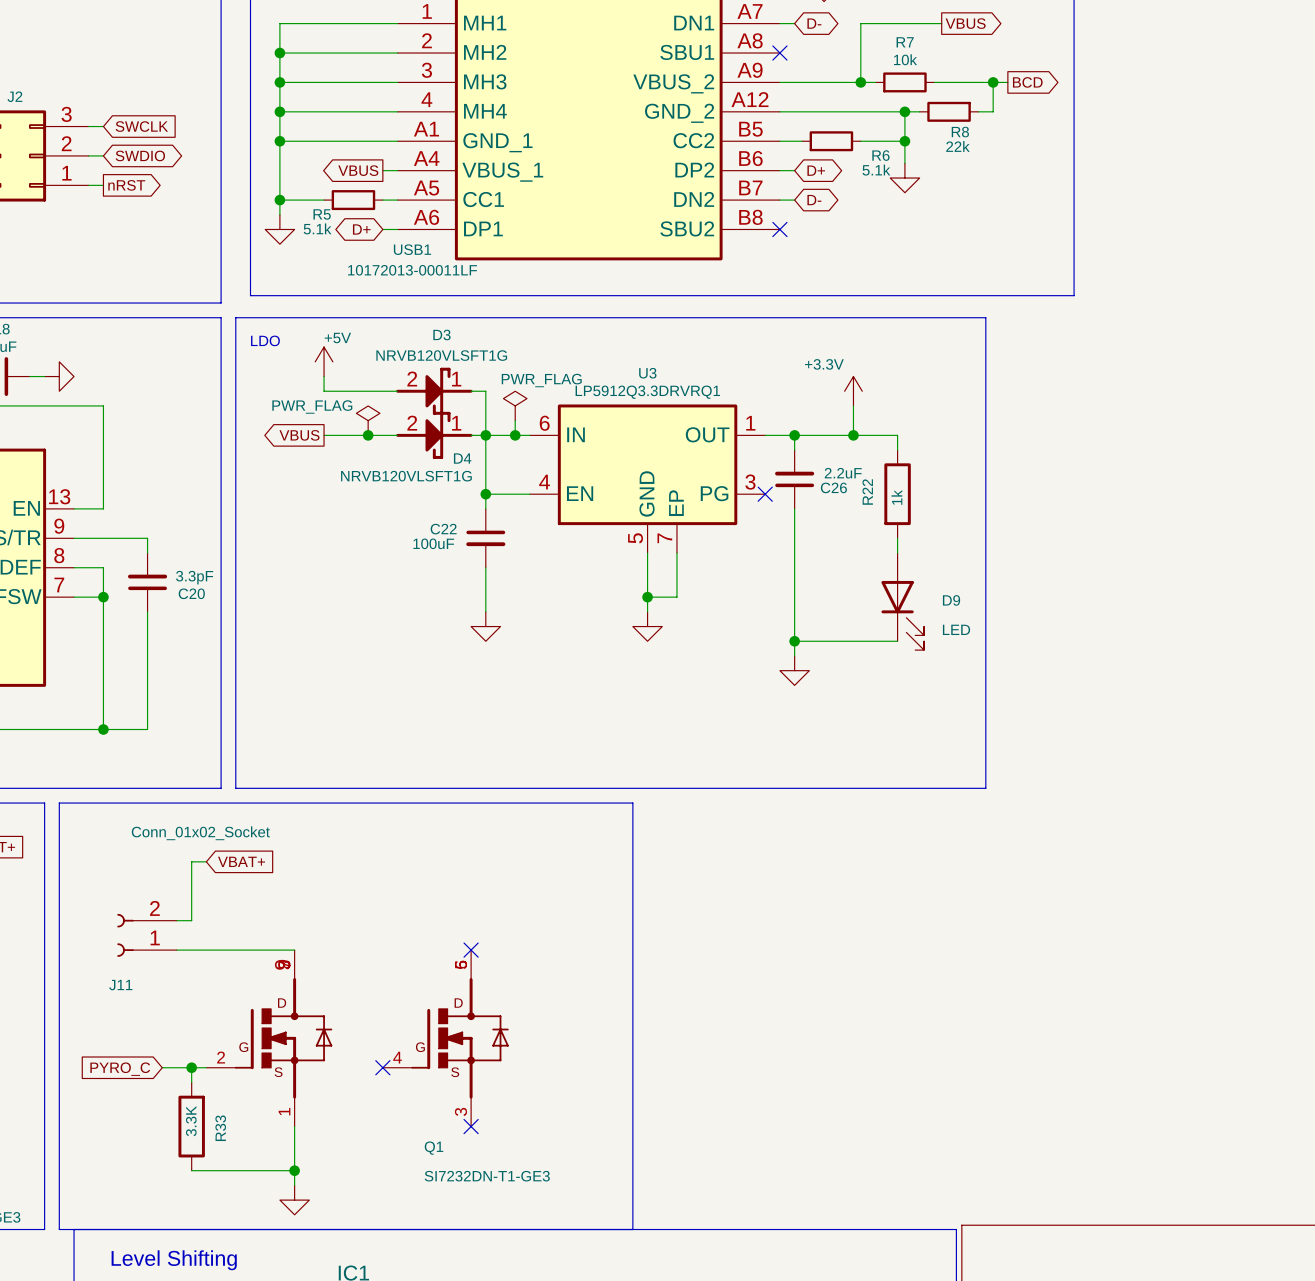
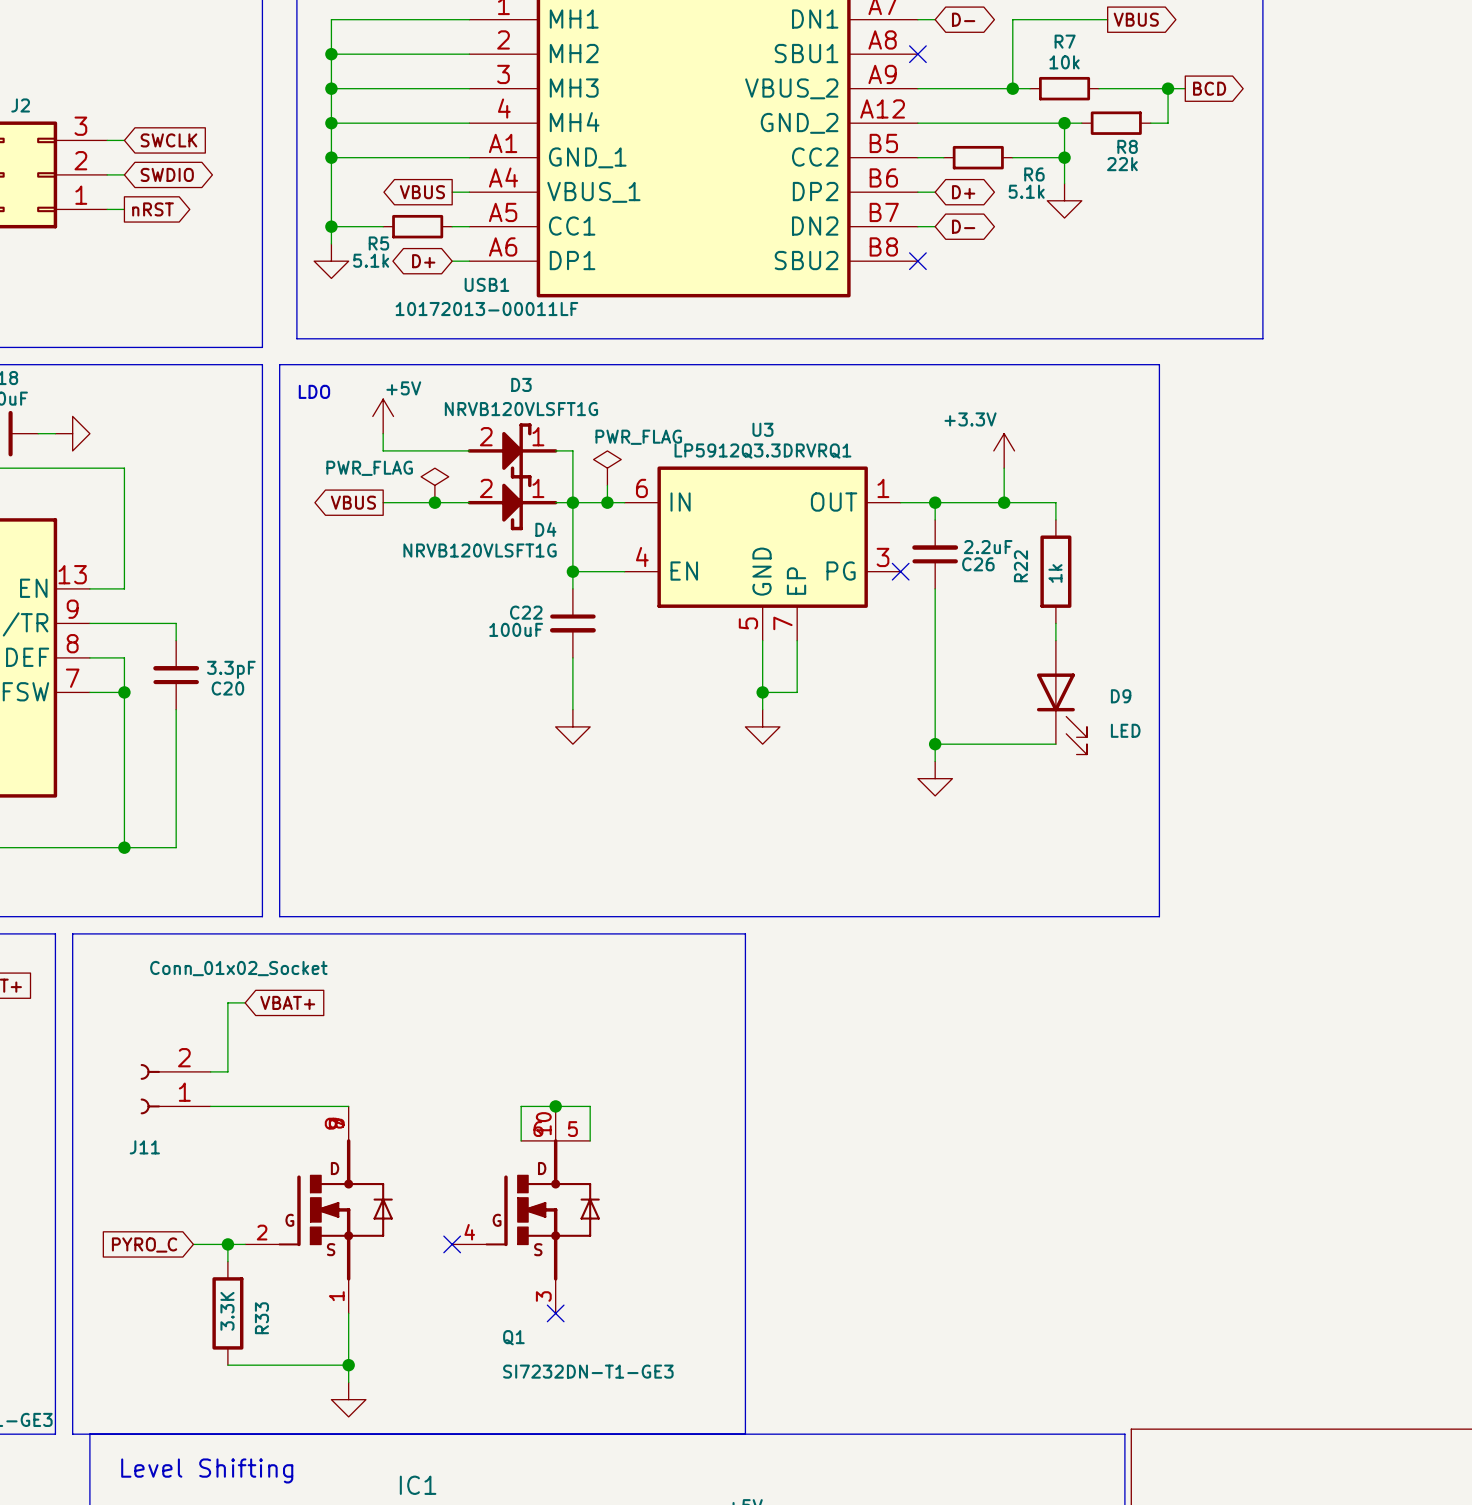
Q1 symbol: [206, 950, 509, 1127] -> [245, 1106, 600, 1314]
no-connect mark: (471, 950) -> none
junction: none -> (555, 1106)
wire: none -> (521, 1140) (521, 1106) (590, 1106) (590, 1140)

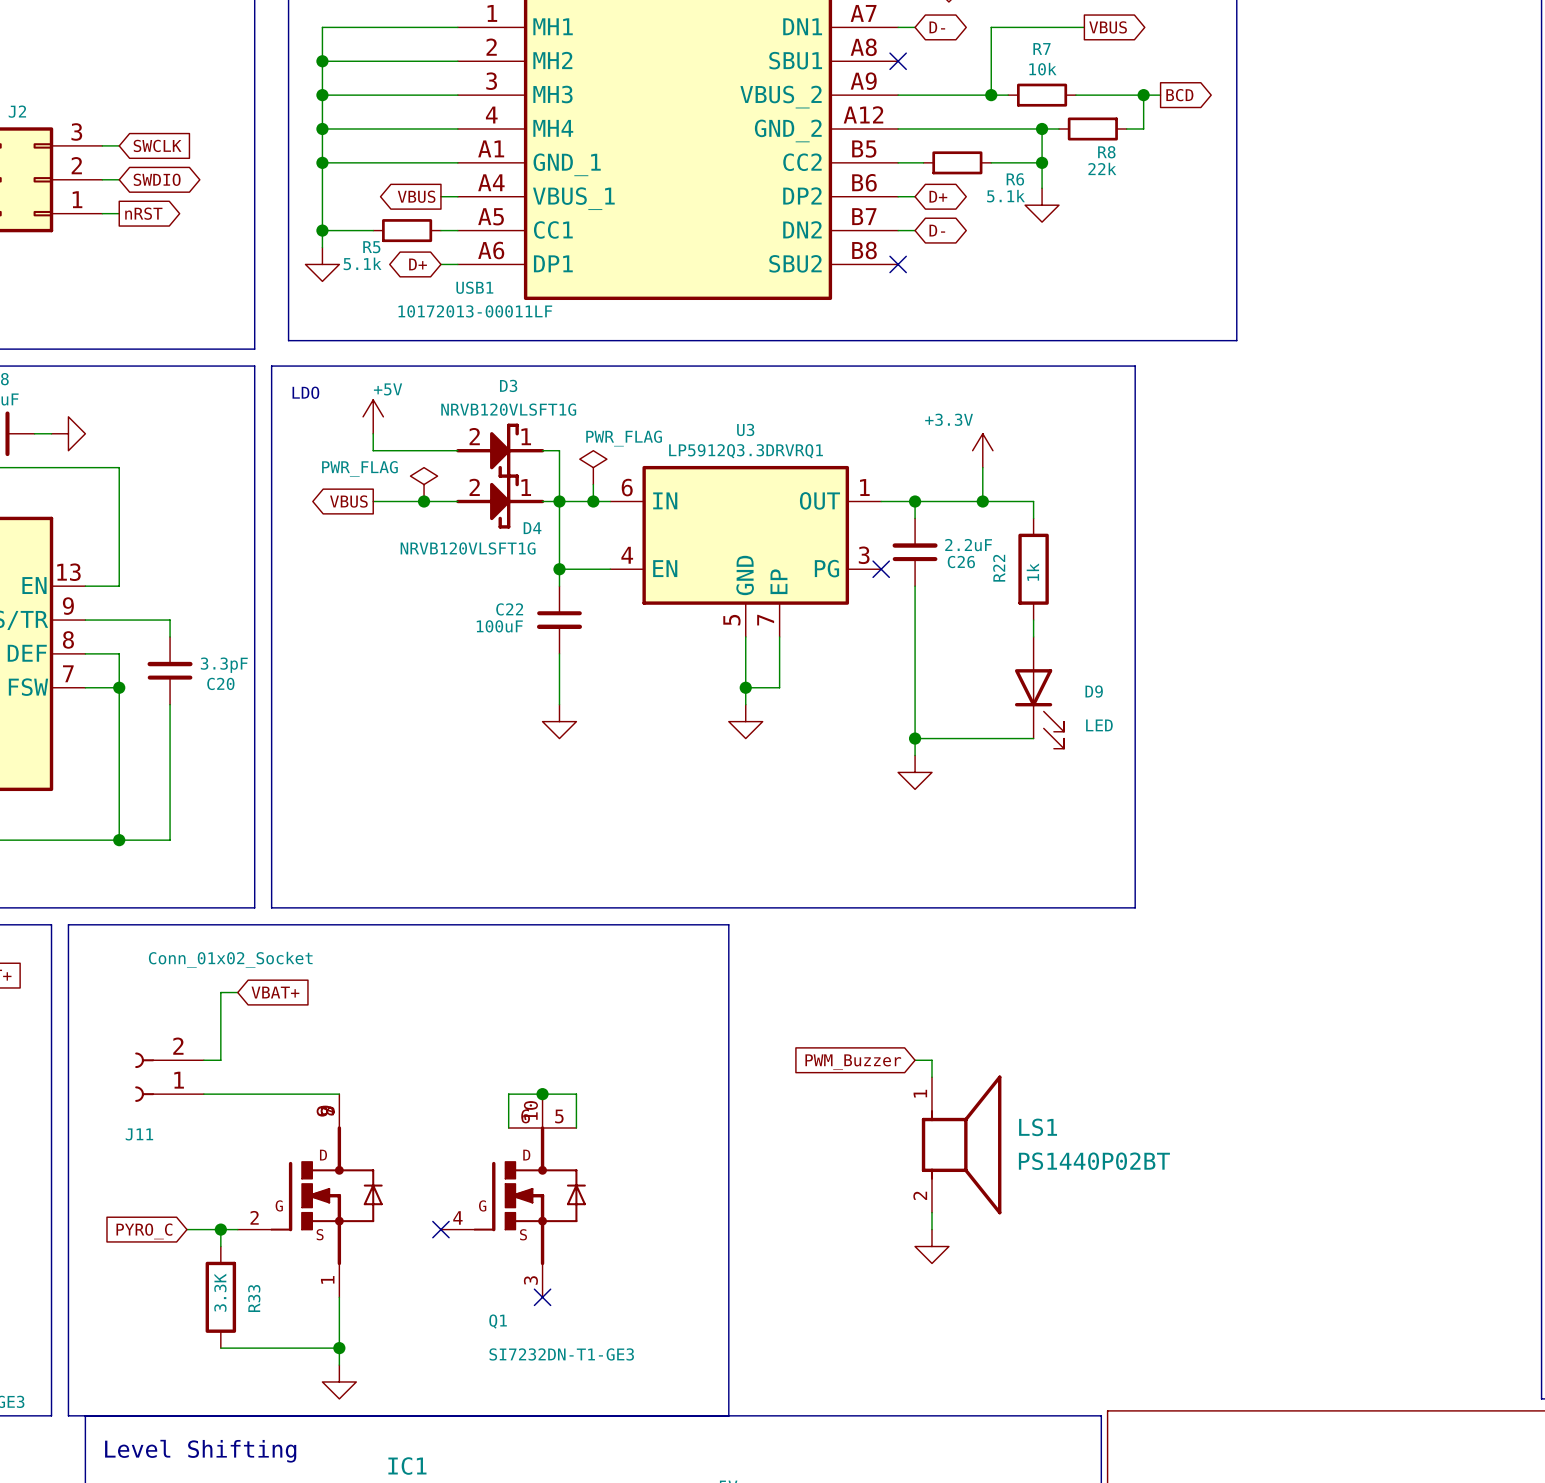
wire: none -> (915, 1060) (931, 1060) (931, 1077)
global label: none -> PWM_Buzzer (853, 1062)
LS1: none -> PS1440P02BT (961, 1144)
wire: none -> (931, 1212) (931, 1229)
power symbol: none -> (931, 1246)

